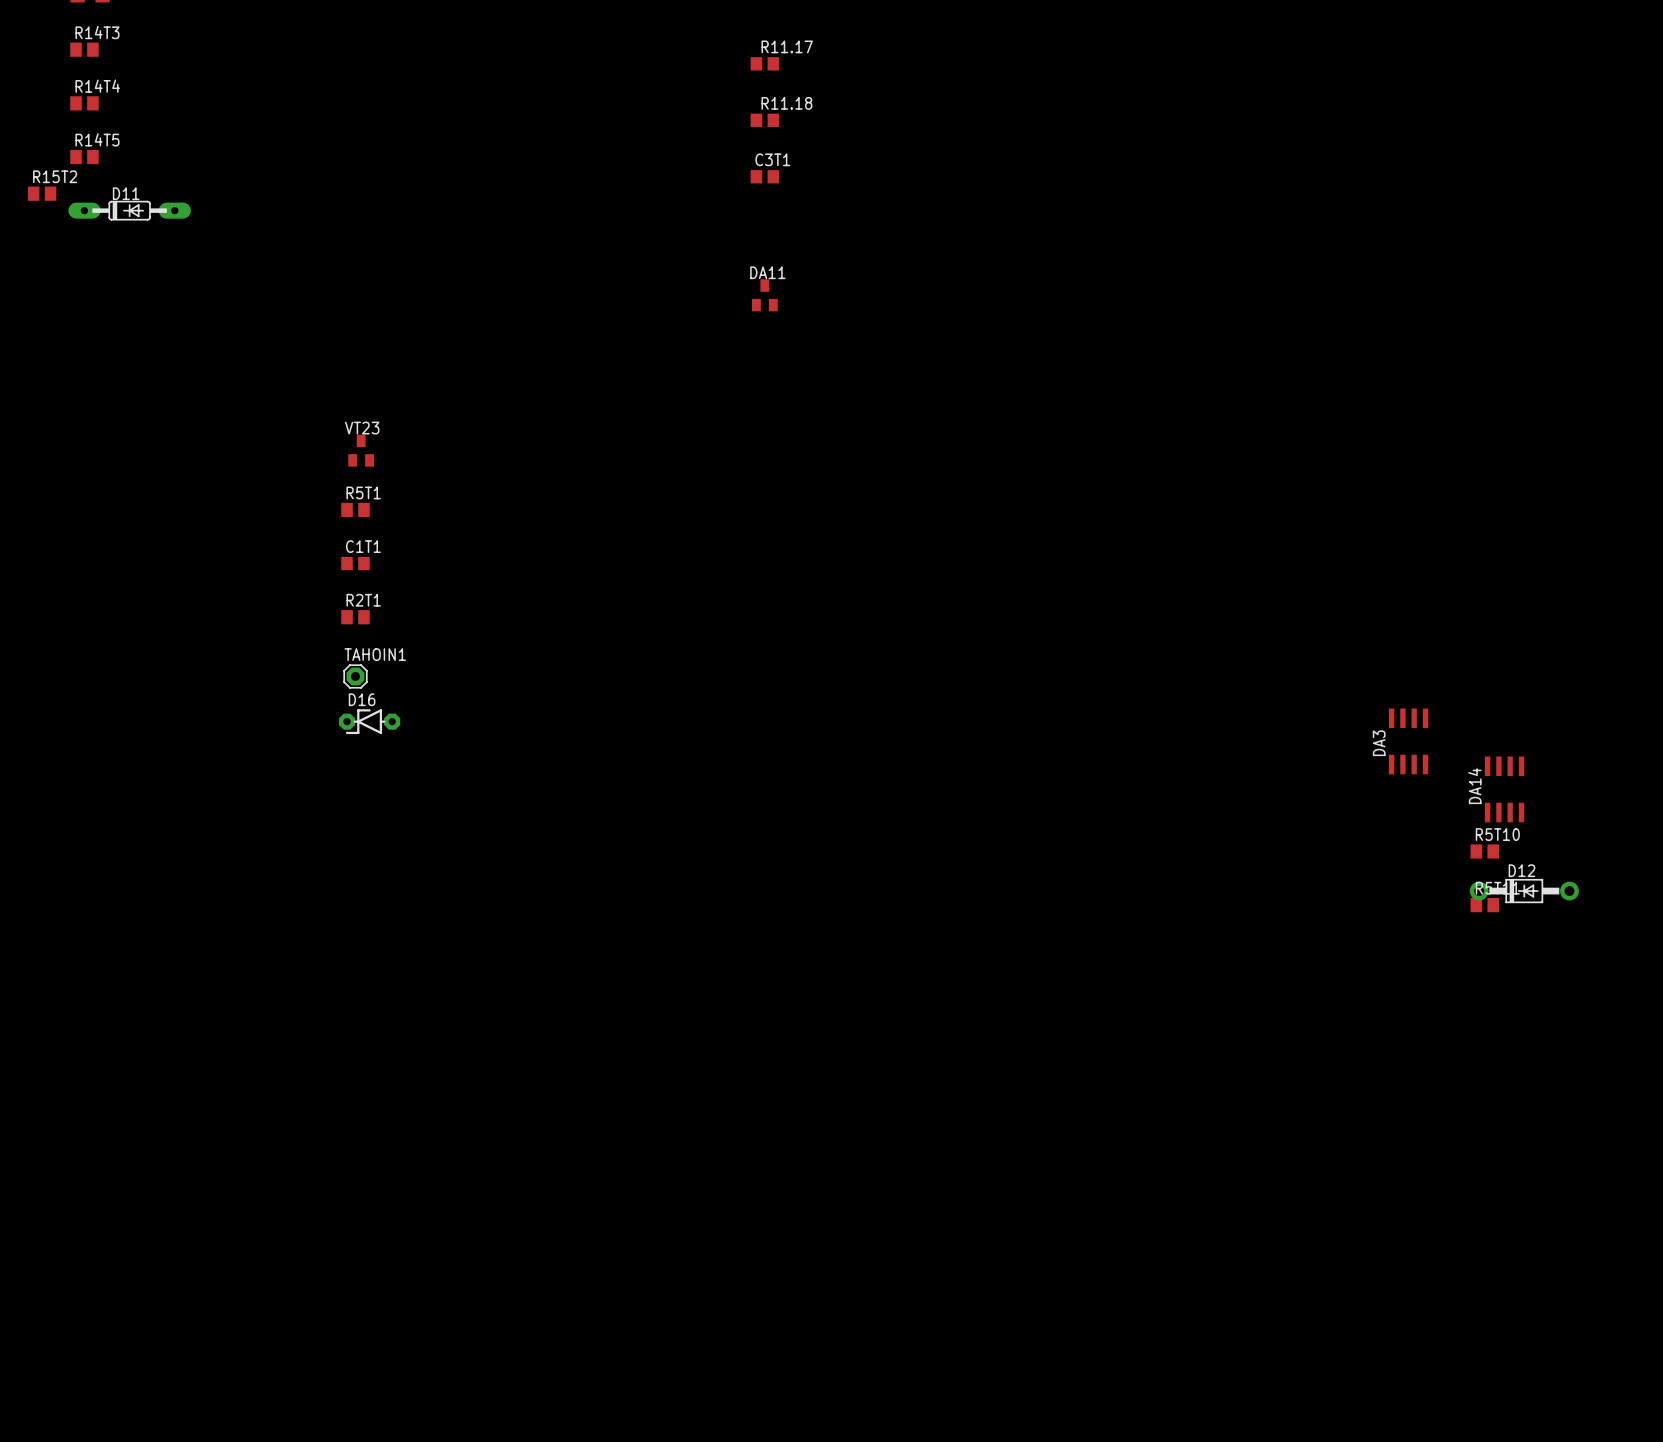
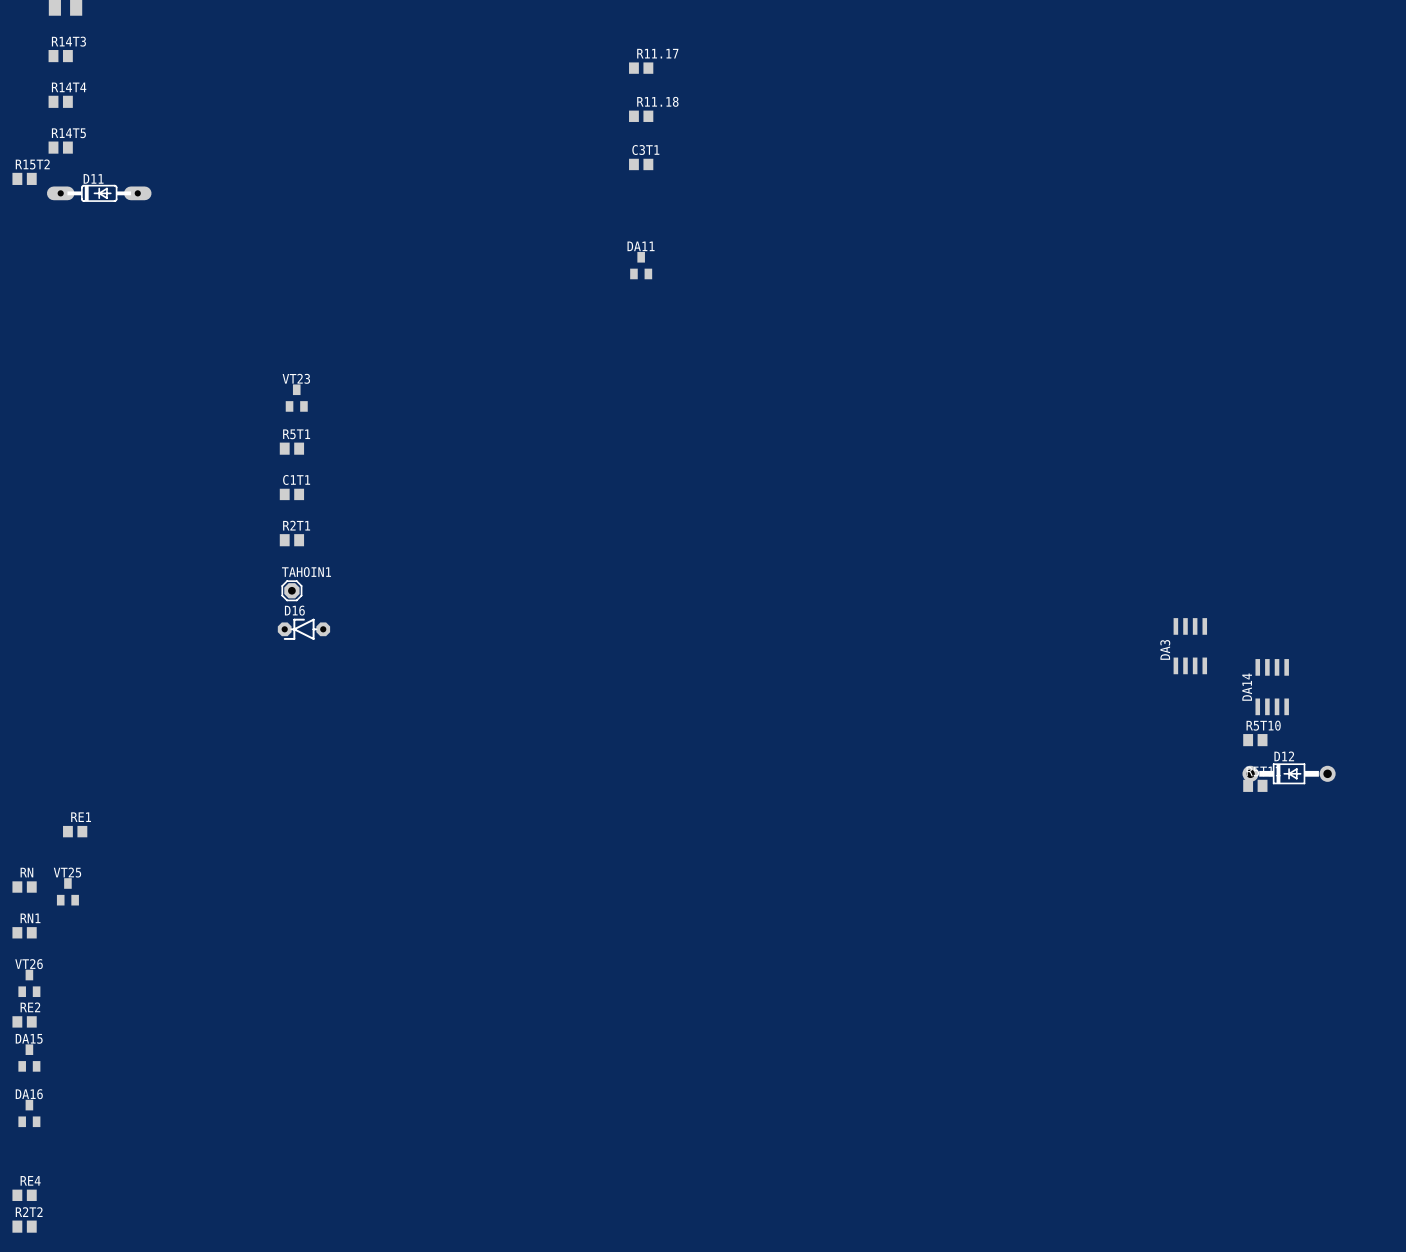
RE1: none -> (75, 831)
RN: none -> (24, 887)
VT25: none -> (67, 891)
RN1: none -> (24, 932)
VT26: none -> (29, 983)
RE2: none -> (24, 1021)
DA15: none -> (29, 1058)
DA16: none -> (29, 1113)
RE4: none -> (24, 1195)
R2T2: none -> (24, 1226)

